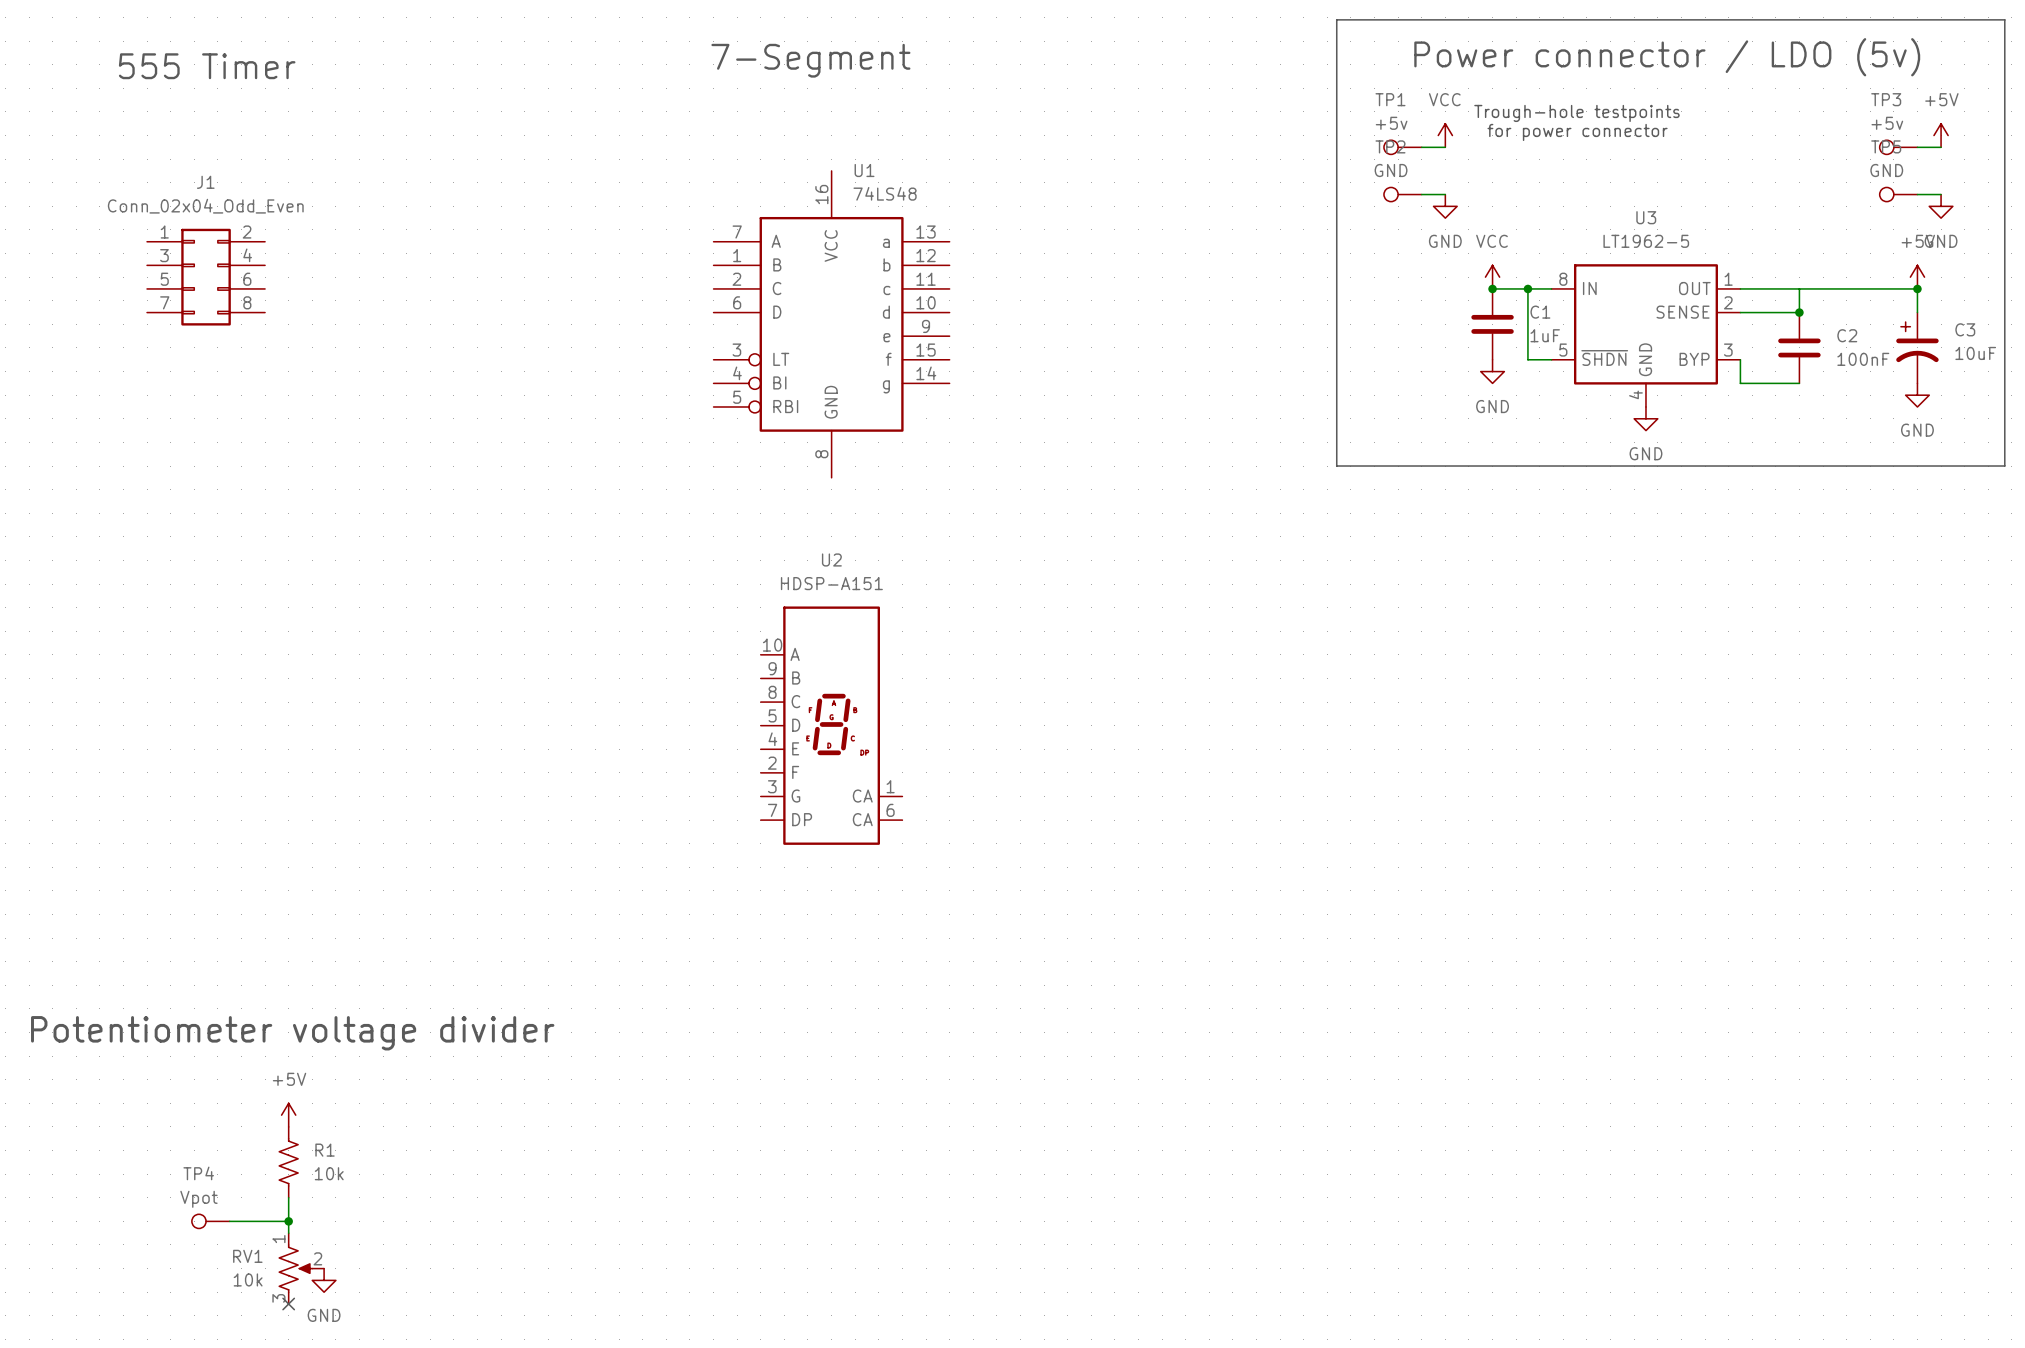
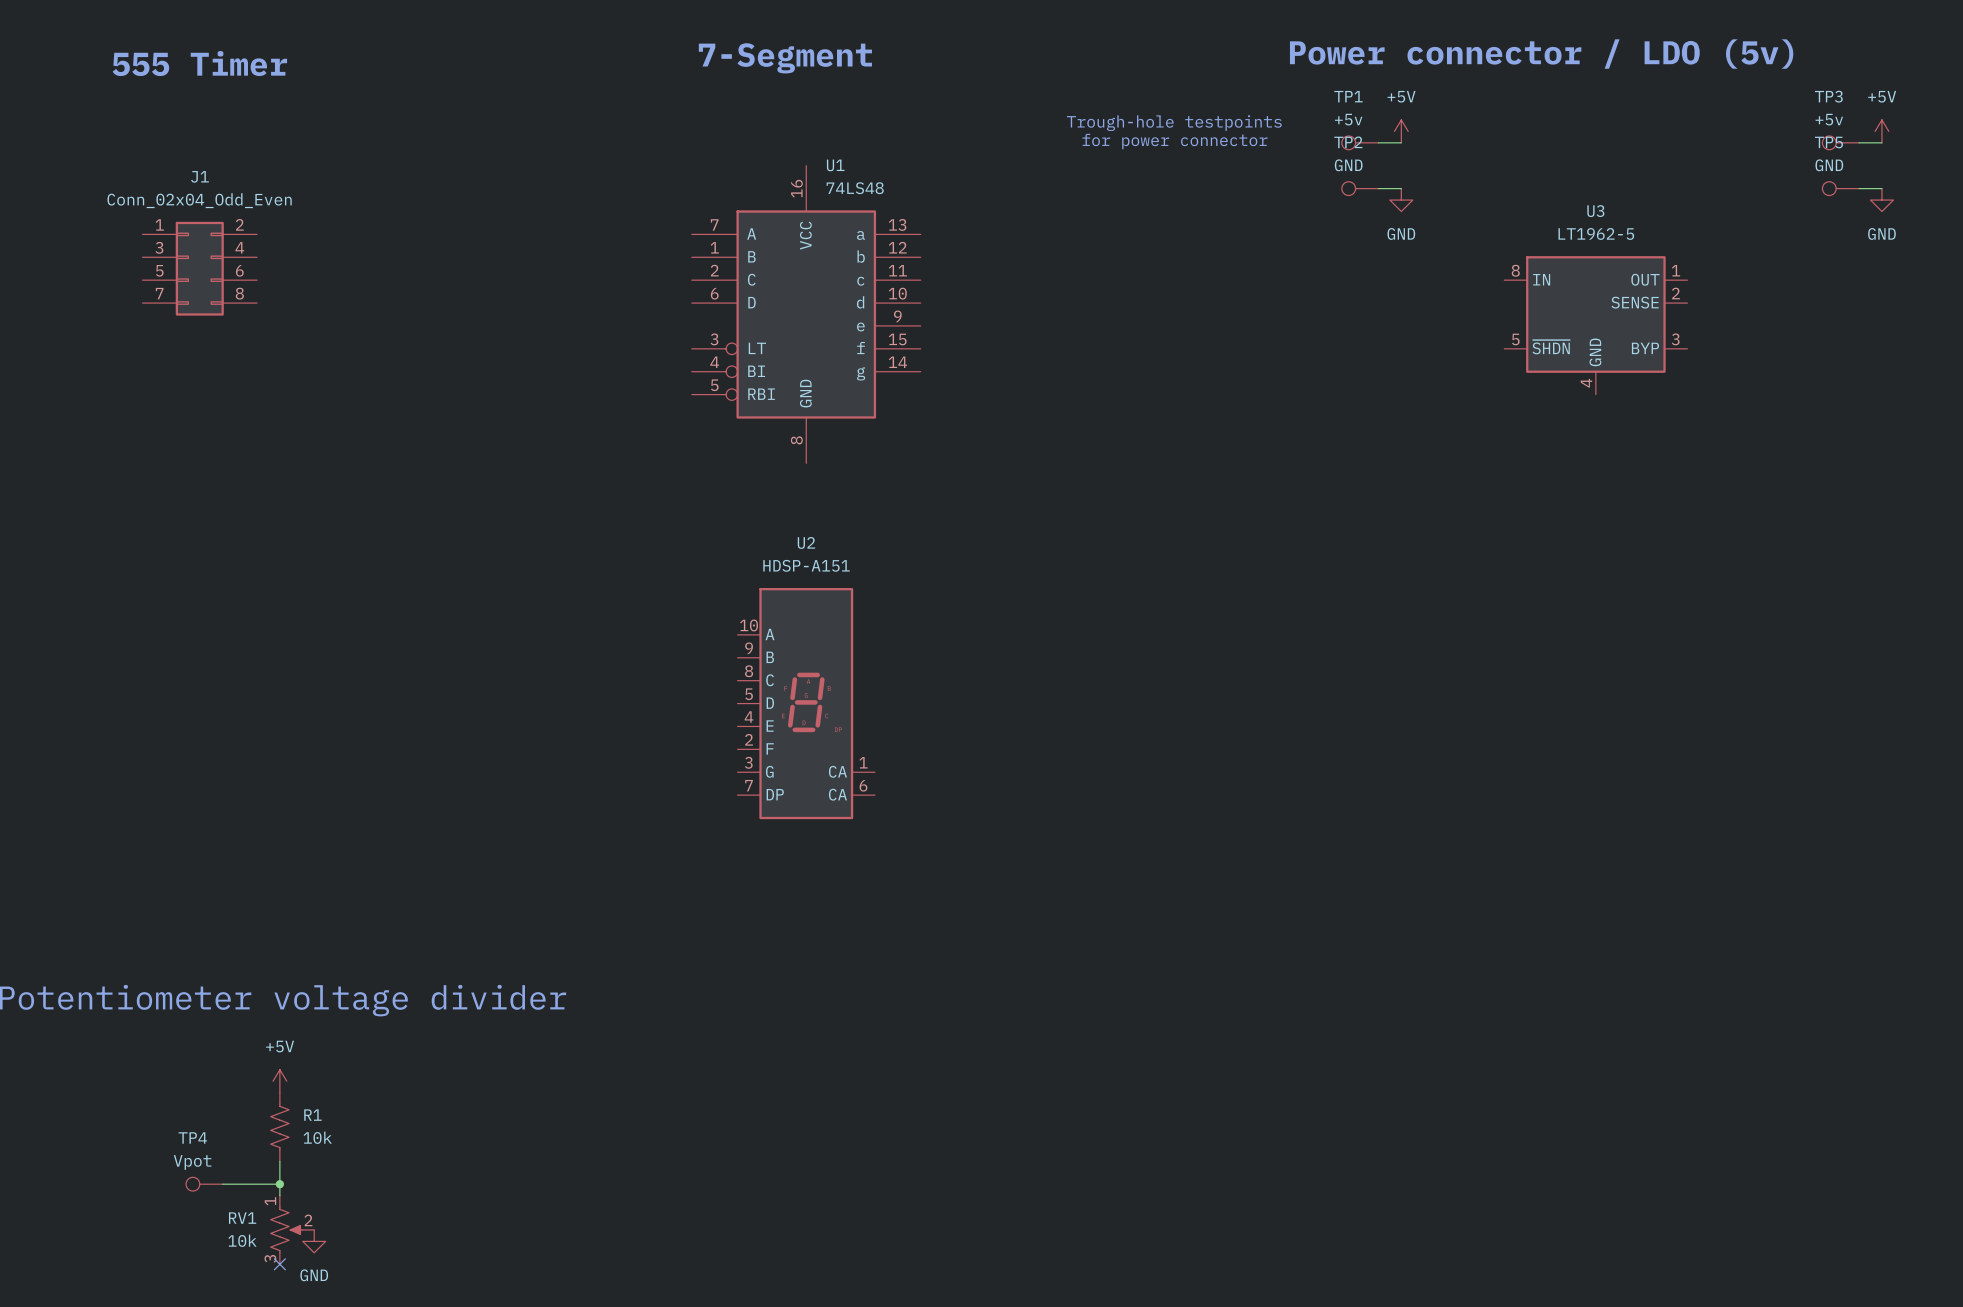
line: (1336, 19) (2004, 19) (2004, 466) (1336, 466) (1336, 19) -> none
text position: Power connector / LDO (5v) (1667, 57) -> Power connector / LDO (5v) (1541, 54)
text: Trough-hole testpoints (1576, 113) -> none
text: none -> Trough-hole testpoints (1174, 123)
text: for power connector (1577, 132) -> none
power symbol: VCC (1445, 135) -> +5V (1401, 131)
text: none -> for power connector (1175, 141)
power symbol: VCC (1492, 277) -> none
power symbol: +5V (1917, 277) -> none
wire: (1492, 288) (1551, 288) -> none
junction: (1492, 288) -> none
wire: (1527, 288) (1527, 359) (1551, 359) -> none
junction: (1527, 288) -> none
wire: (1740, 288) (1917, 288) (1917, 312) -> none
wire: (1799, 288) (1799, 312) (1740, 312) -> none
junction: (1917, 288) -> none
junction: (1799, 312) -> none
C1: 1uF (1492, 324) -> none
C2: 100nF (1799, 347) -> none
C3: 10uF (1917, 347) -> none
wire: (1740, 359) (1740, 383) (1799, 383) -> none
power symbol: GND (1492, 371) -> none
power symbol: GND (1917, 395) -> none
power symbol: GND (1645, 418) -> none

